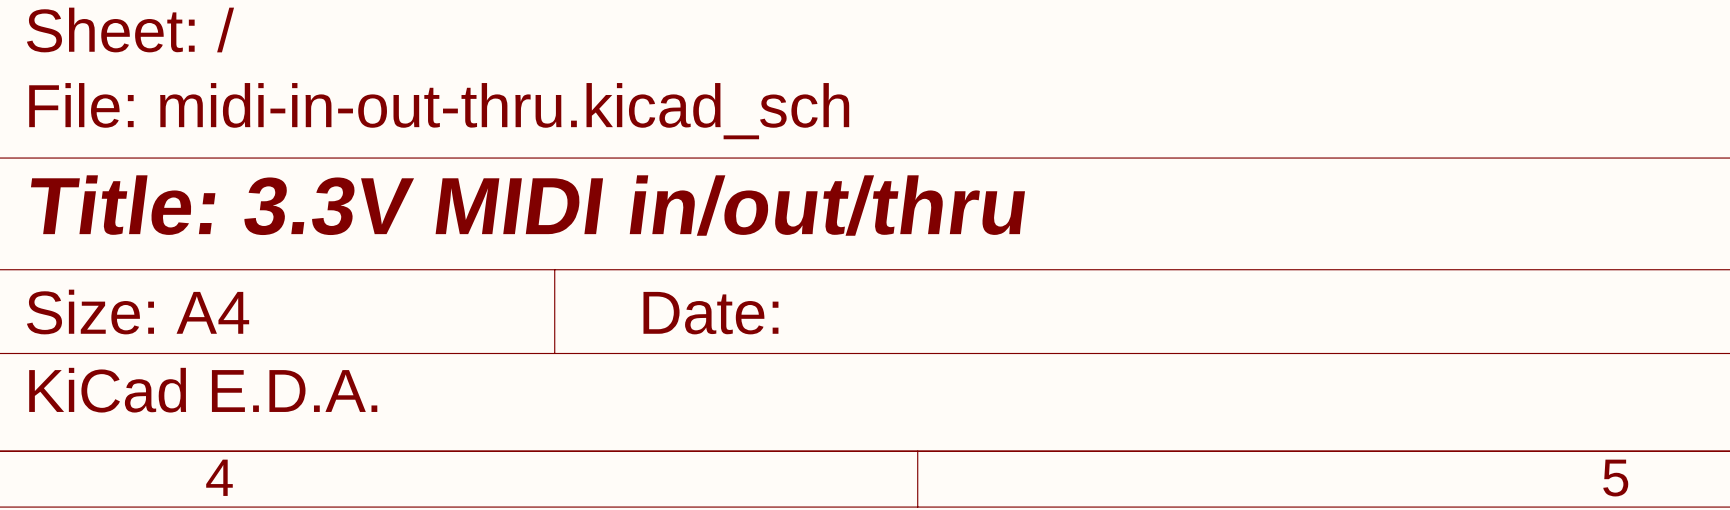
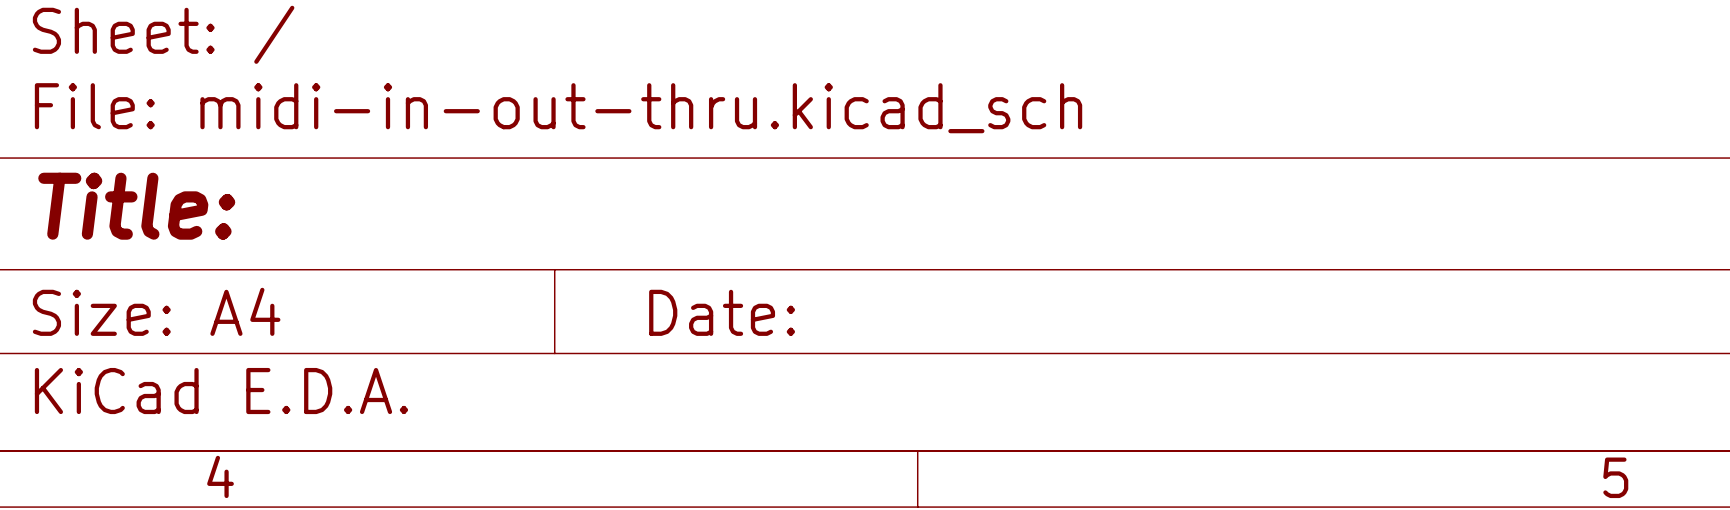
title block: Title: 3.3V MIDI in/out/thru (527, 205) -> Title: (136, 206)

